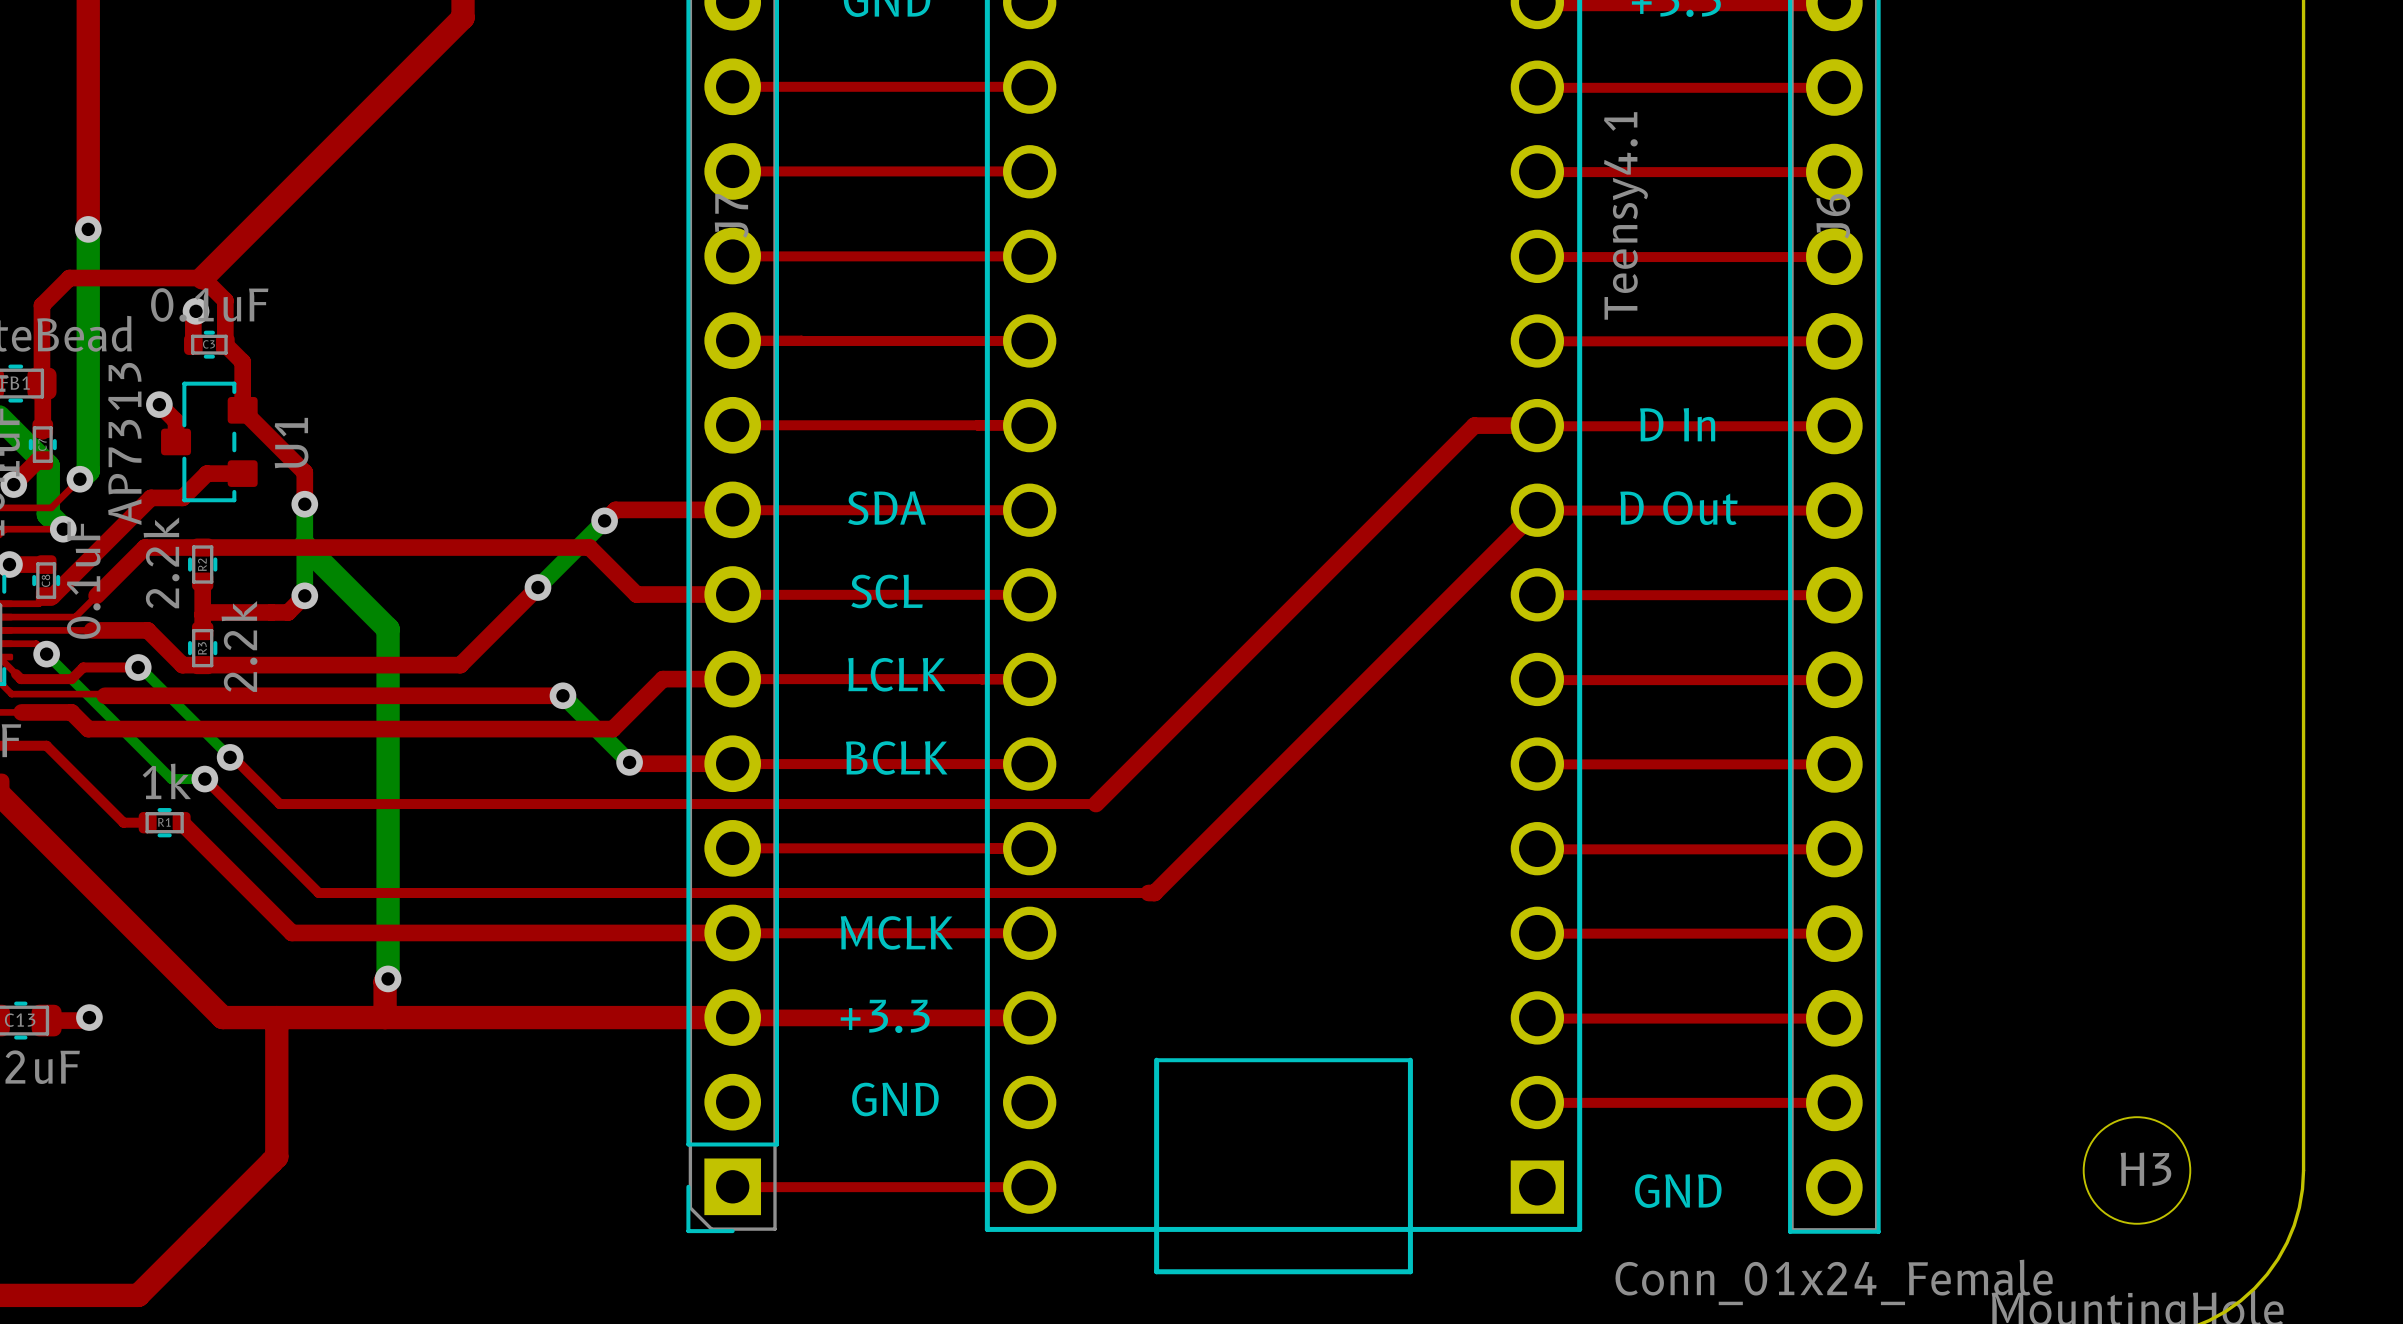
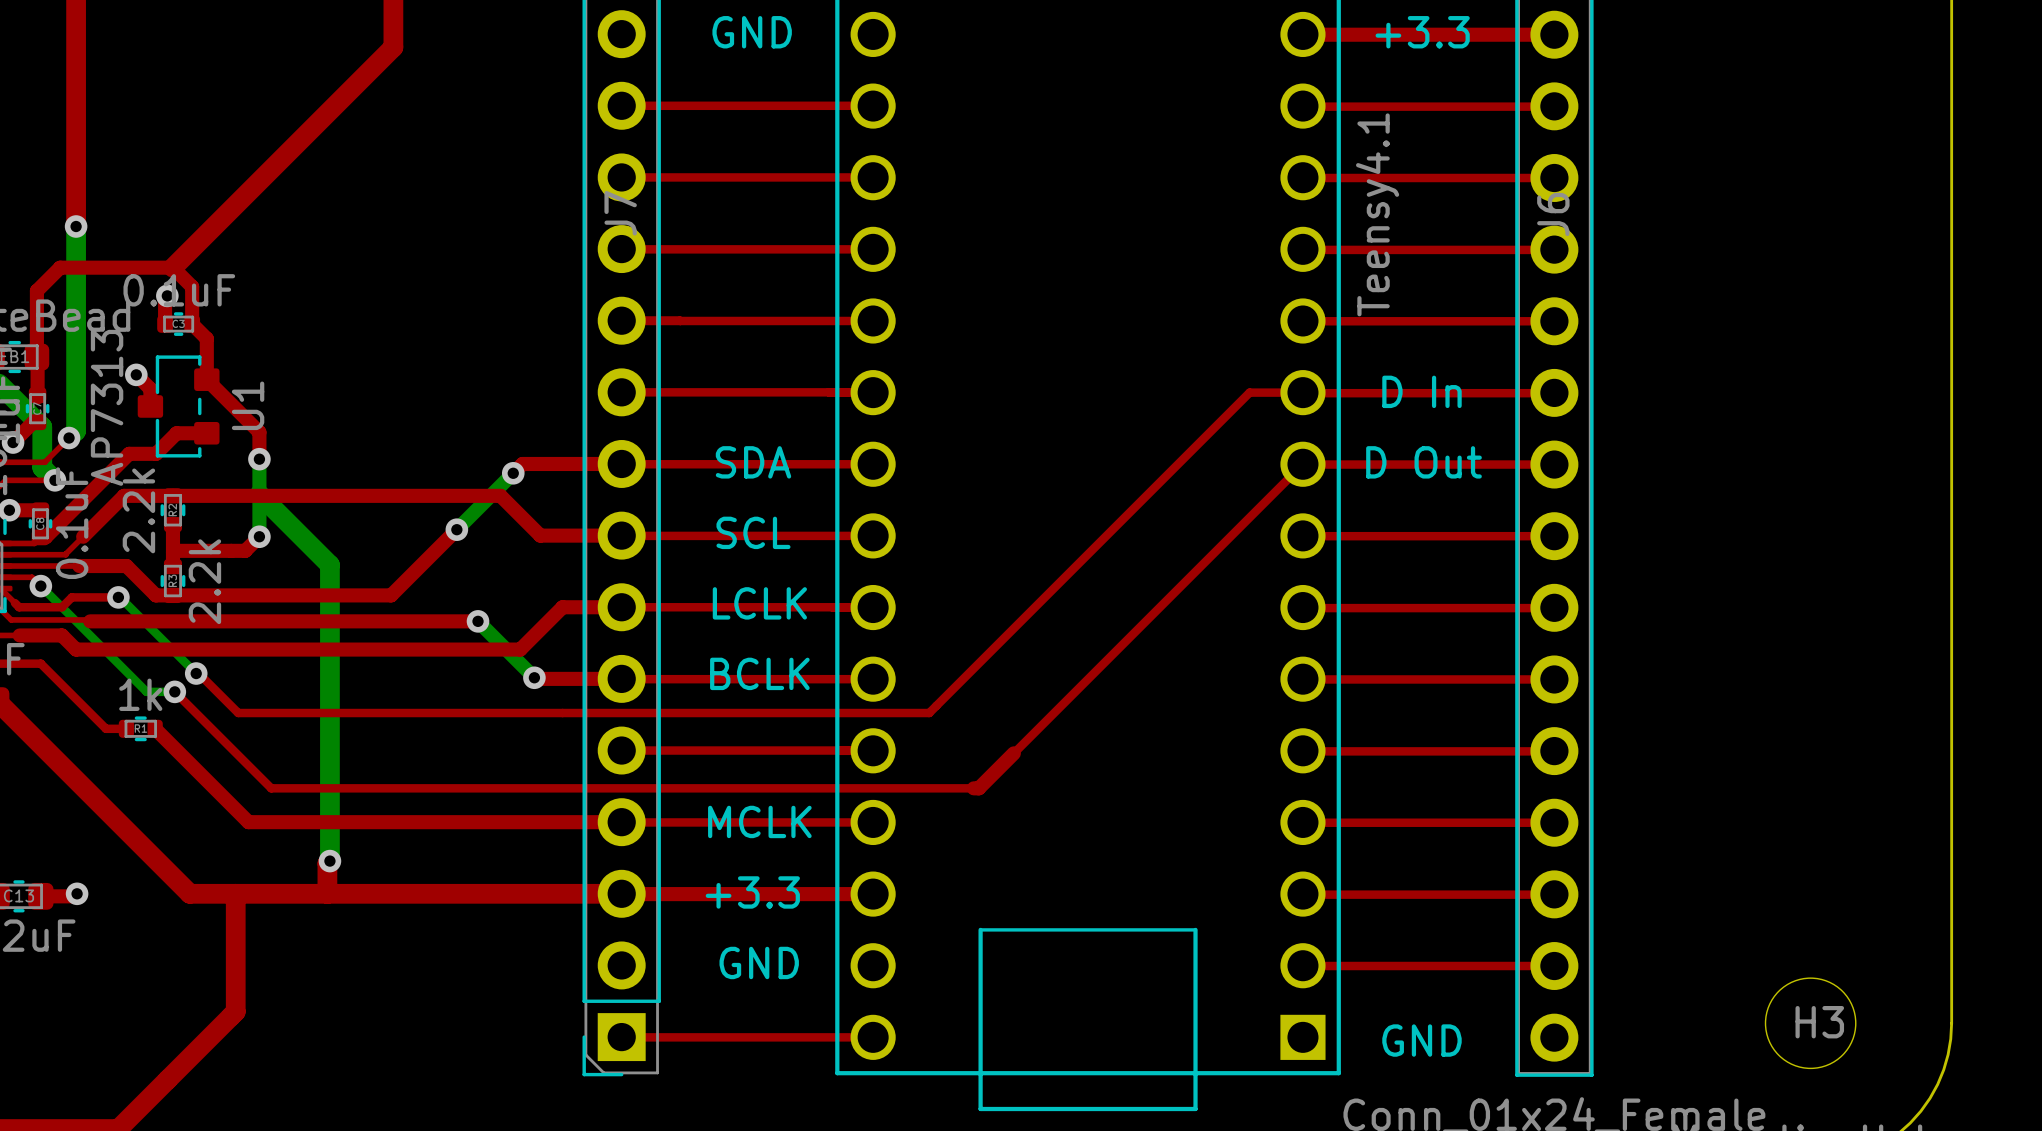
top track width: thick (1537, 425) (1474, 425) (1095, 804) -> thin (1302, 392) (1249, 392) (929, 713)
top track width: thick (1537, 510) (1195, 851) -> thin (1302, 464) (1013, 753)

